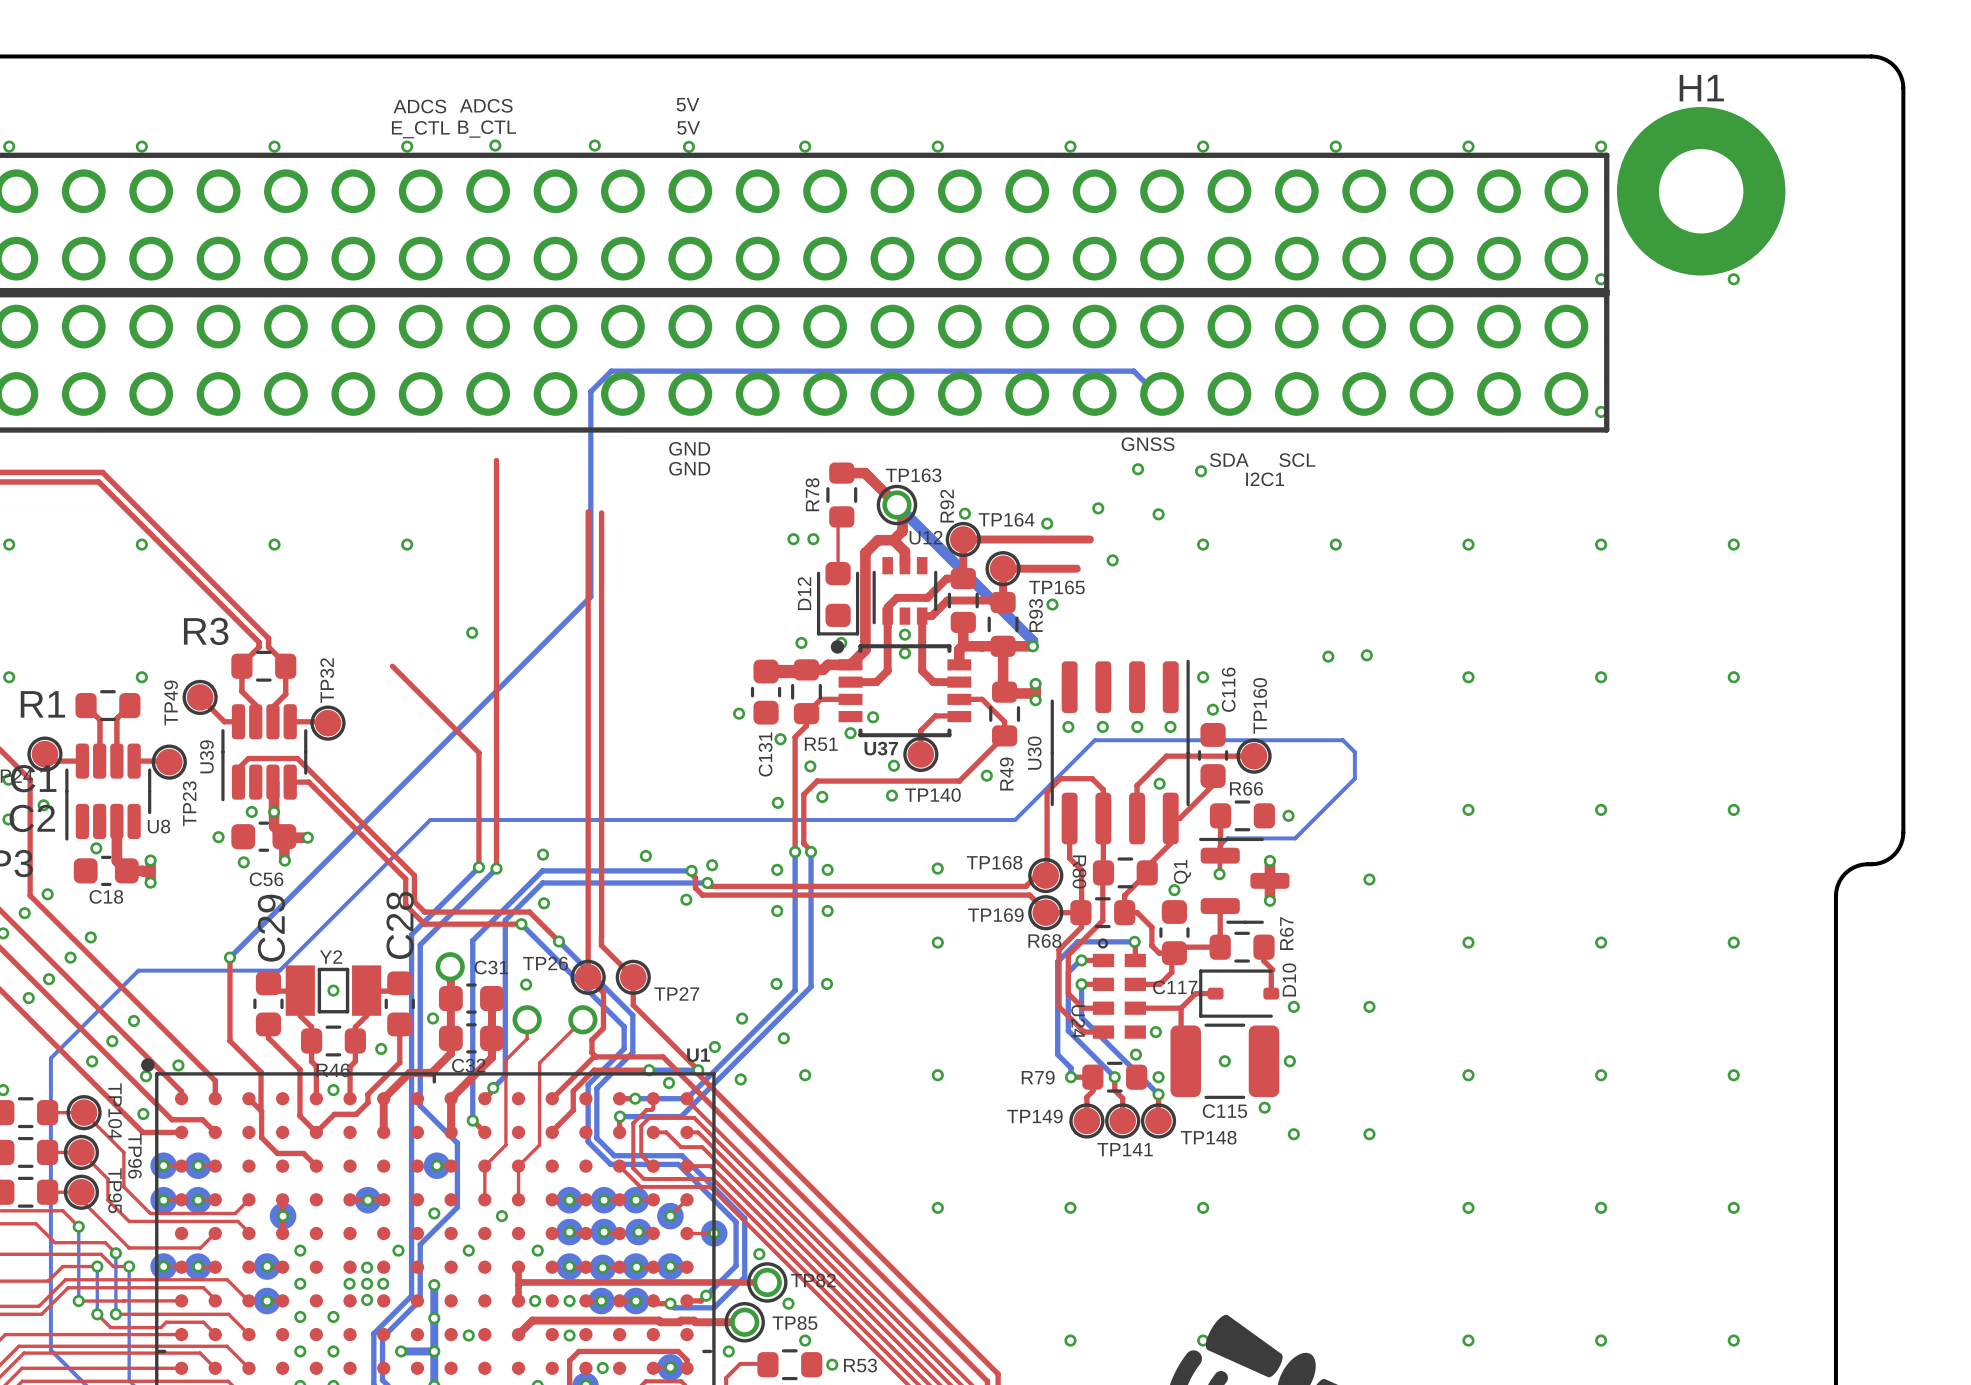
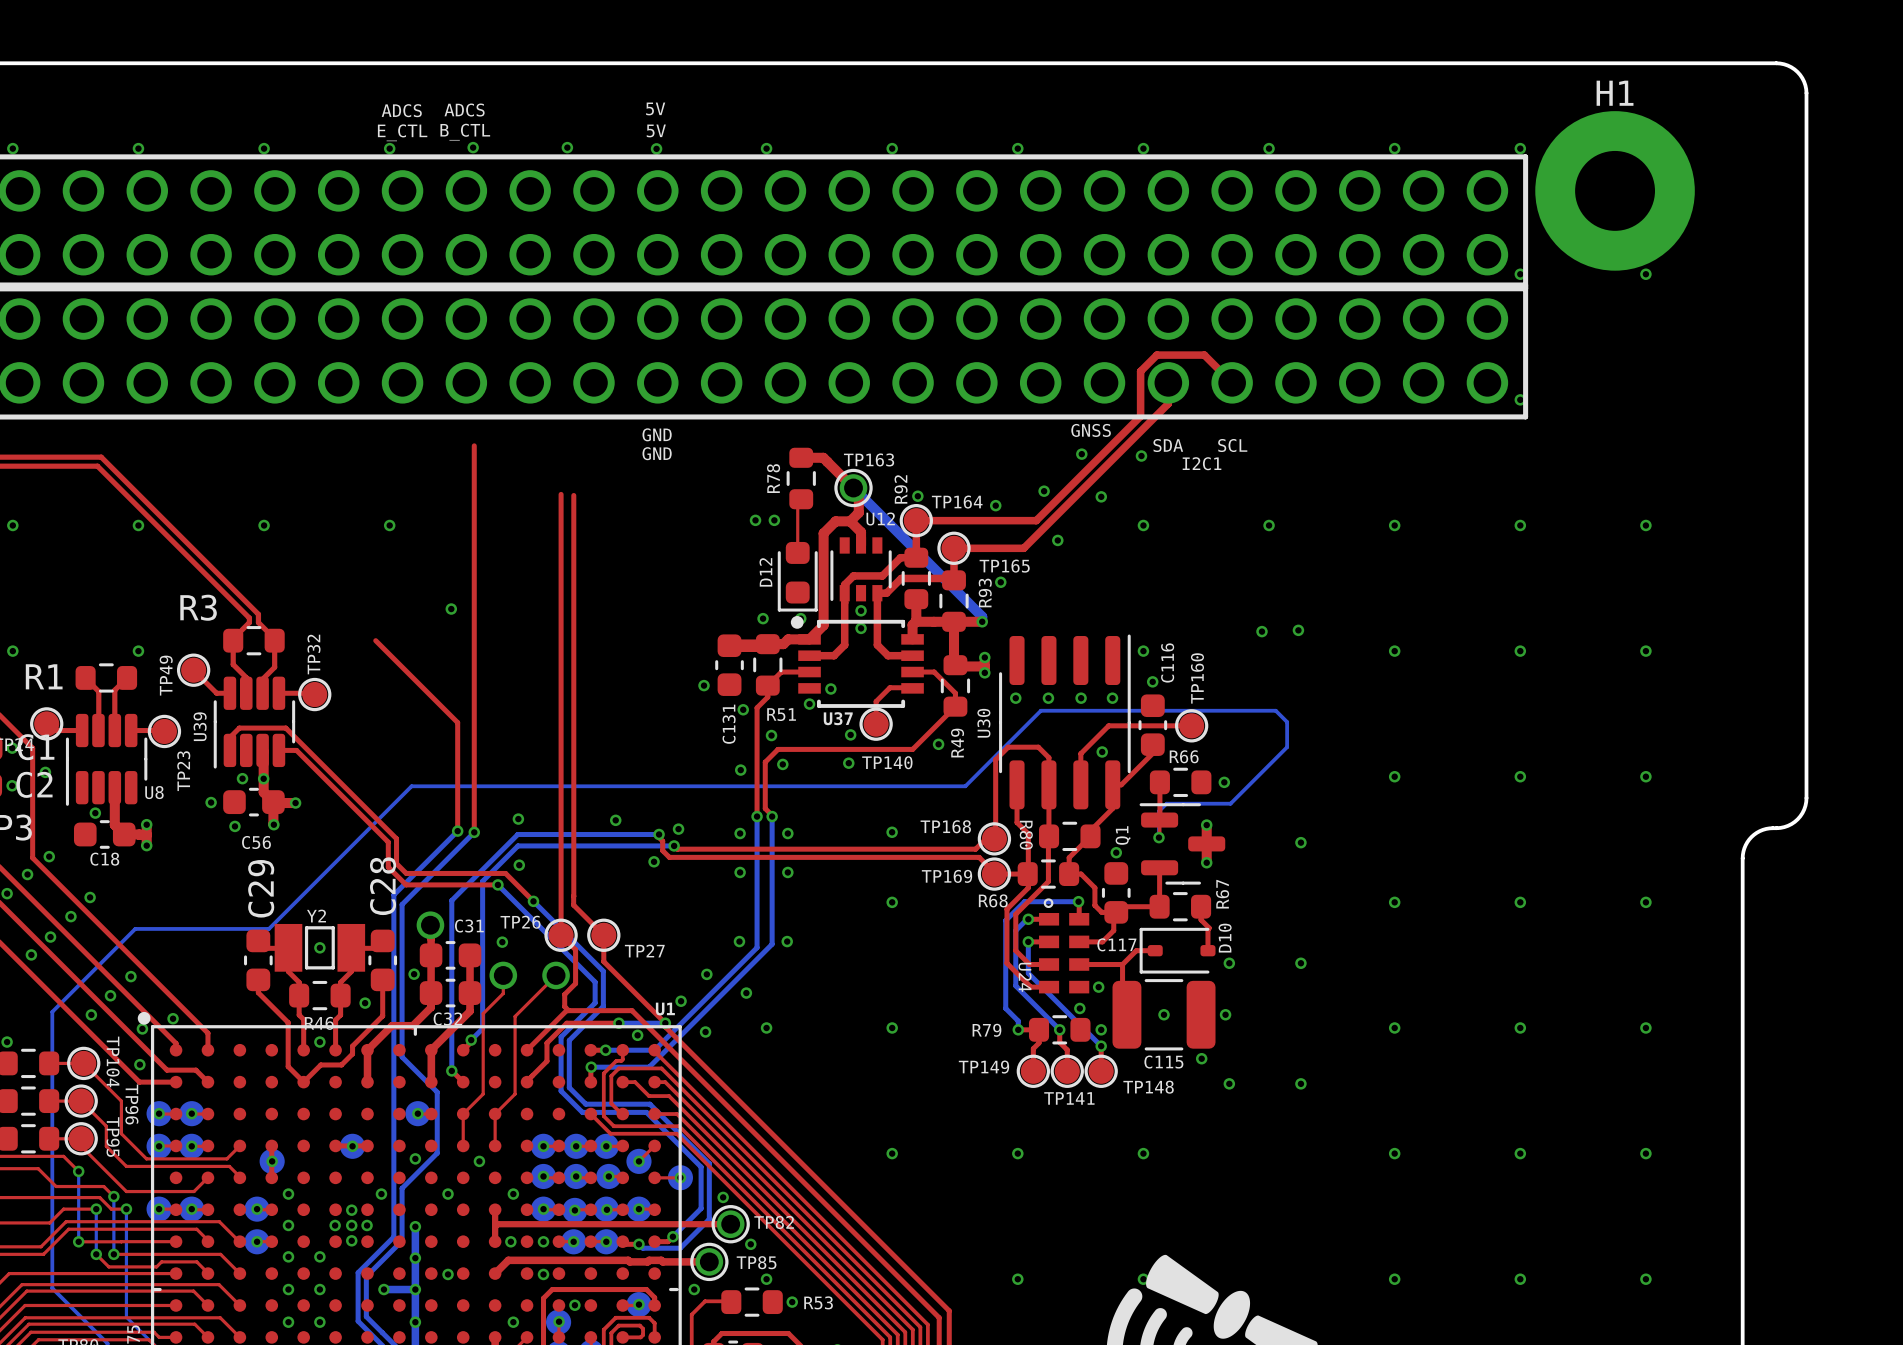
top track: none -> (1168, 382) (1168, 403) (1023, 548)
top track: none -> (1232, 382) (1204, 355) (1156, 355) (1140, 371) (1140, 416) (1036, 520)
bottom track: (1162, 399) (1133, 371) (611, 371) (590, 391) (590, 596) (229, 957) -> none
top track: (229, 957) (229, 1041) (261, 1072) (261, 1110) -> none
via: (229, 957) -> none
top track: (248, 1098) (261, 1111) (261, 1137) (277, 1153) (303, 1153) (316, 1166) -> none

